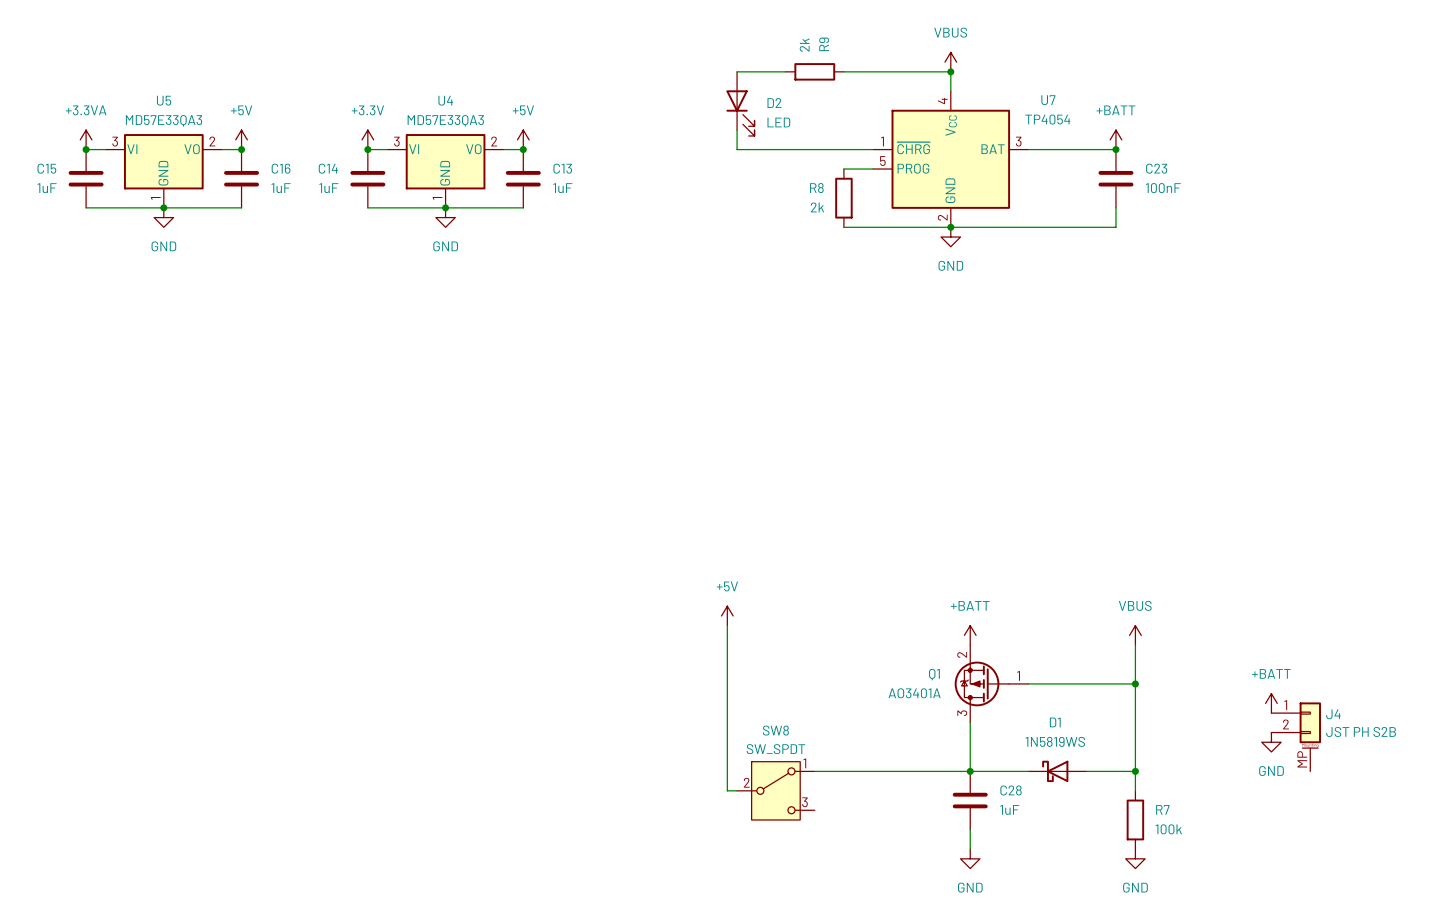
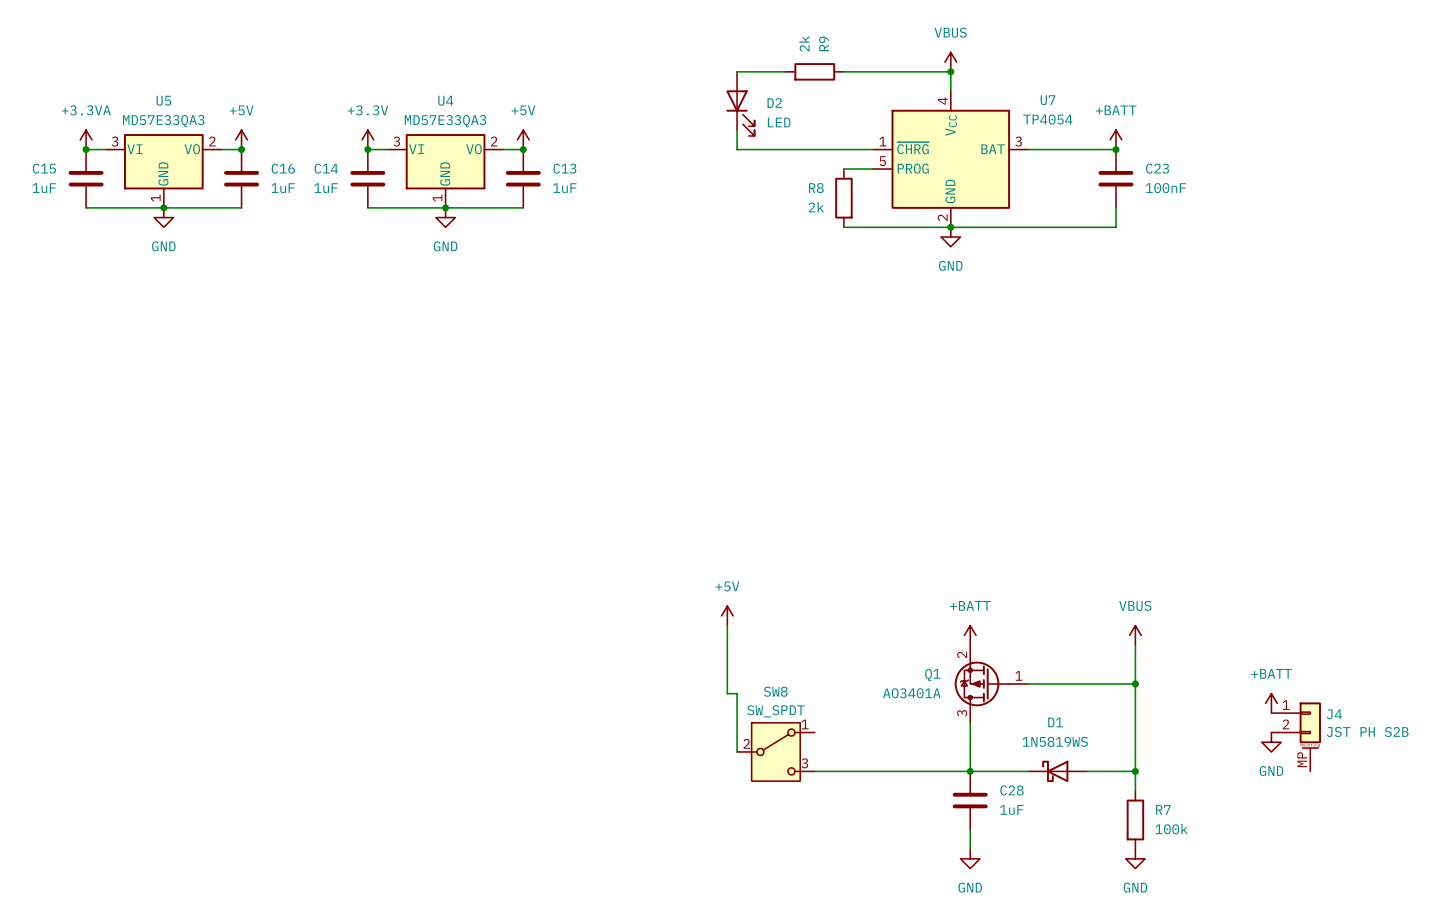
wire: (727, 693) (727, 790) (737, 790) -> (727, 693) (737, 693) (737, 751)
SW8 position: (775, 790) -> (775, 751)

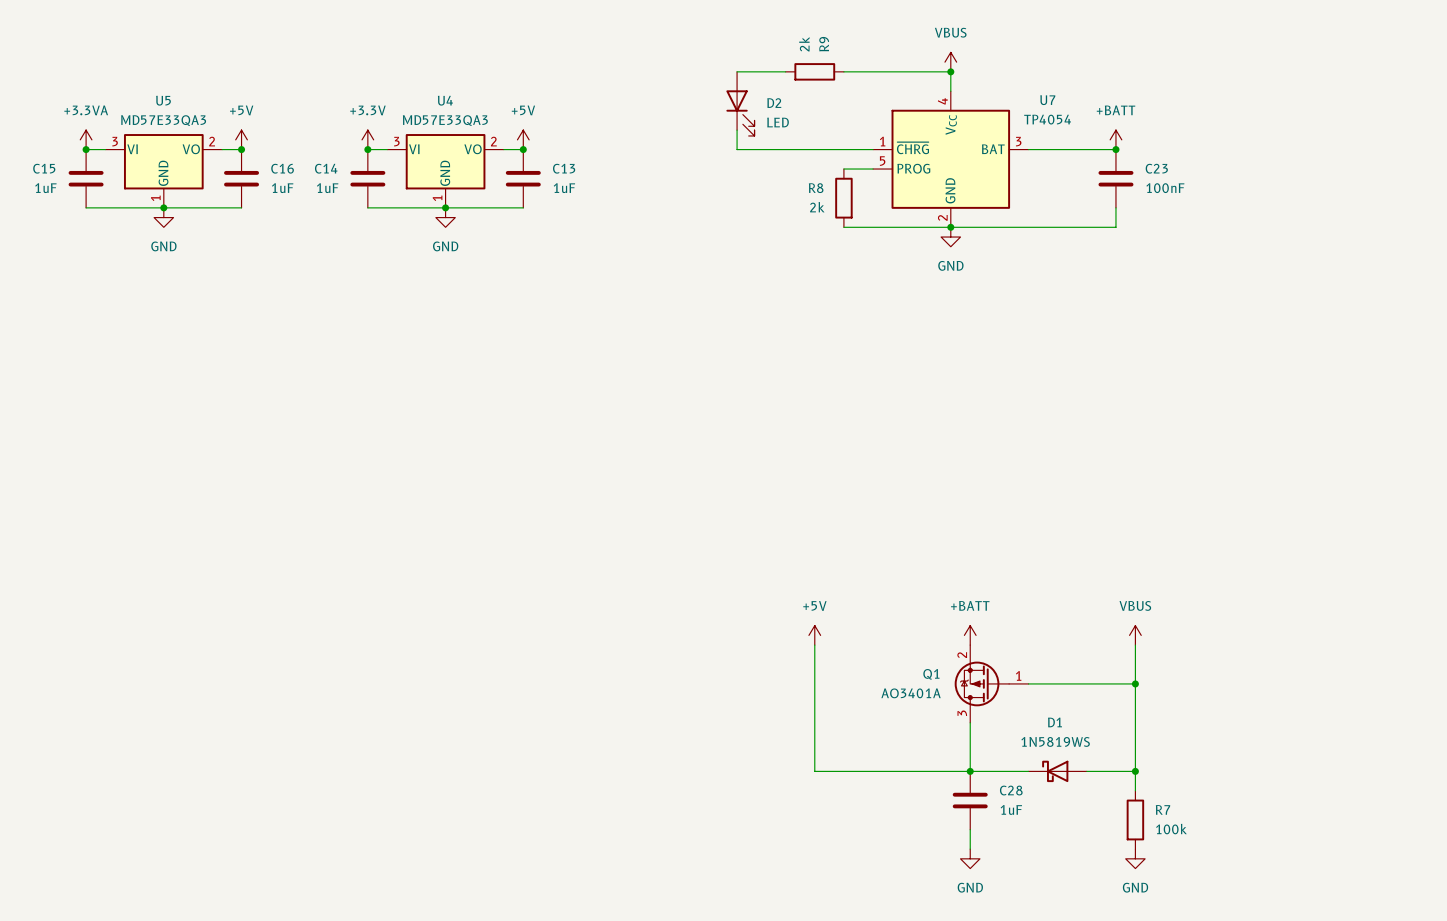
power symbol position: +5V (727, 615) -> +5V (814, 635)
wire: (727, 625) (727, 693) (737, 693) (737, 751) -> none
wire: none -> (814, 645) (814, 771)
power symbol: +BATT (1271, 703) -> none
J4: JST PH S2B (1296, 736) -> none
power symbol: GND (1271, 742) -> none
SW8: SW_SPDT (775, 751) -> none

